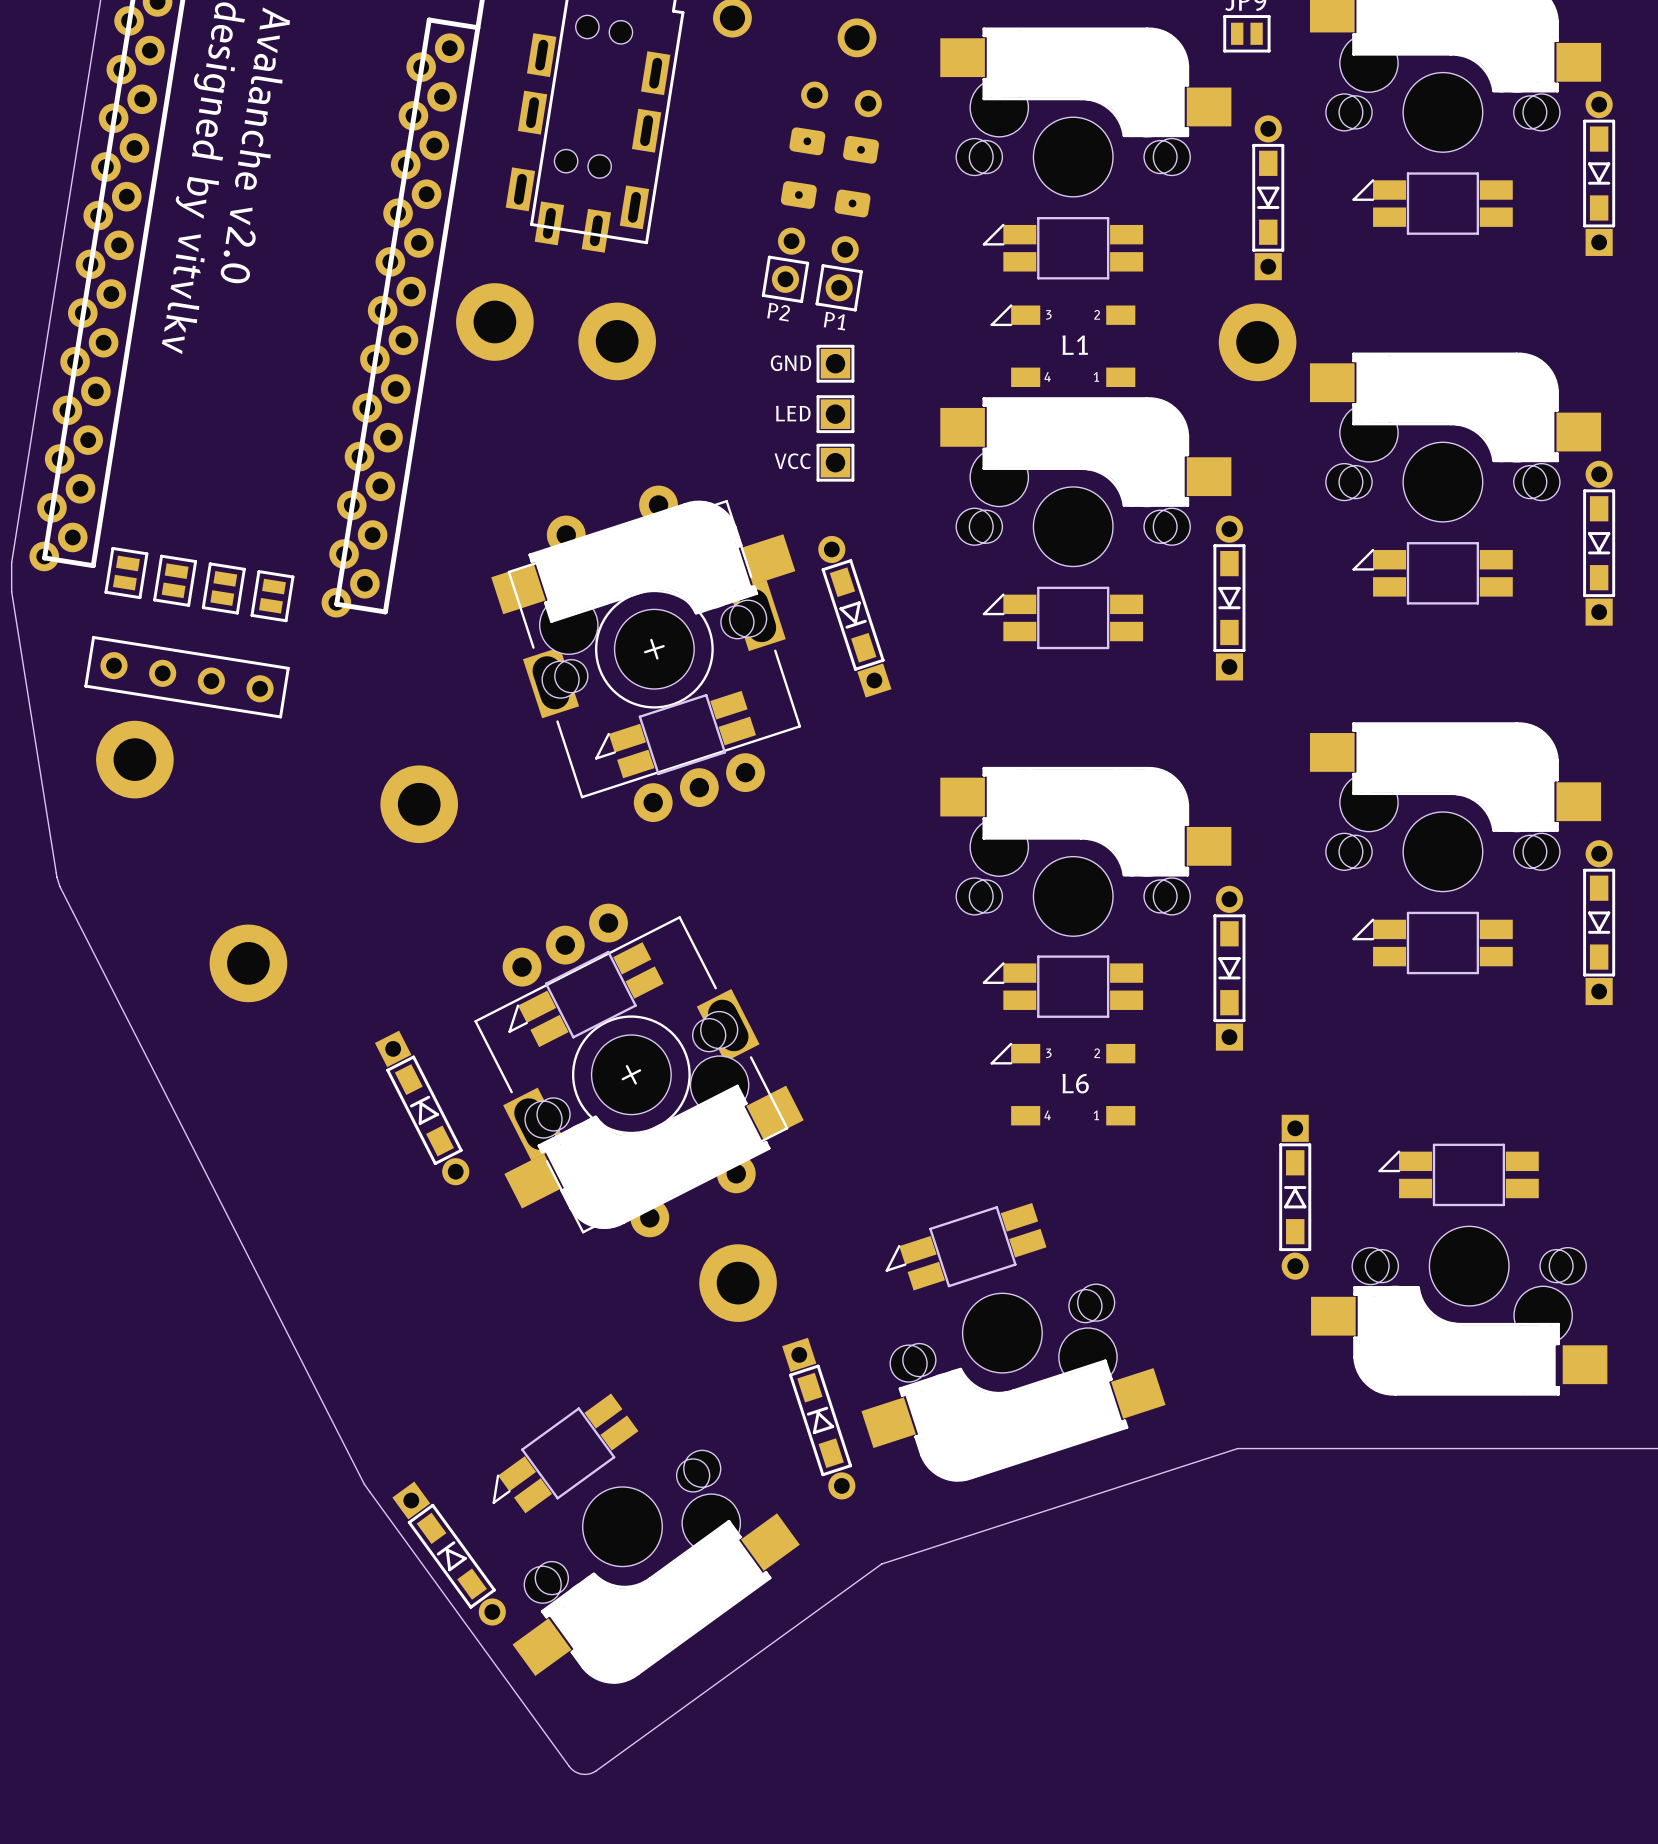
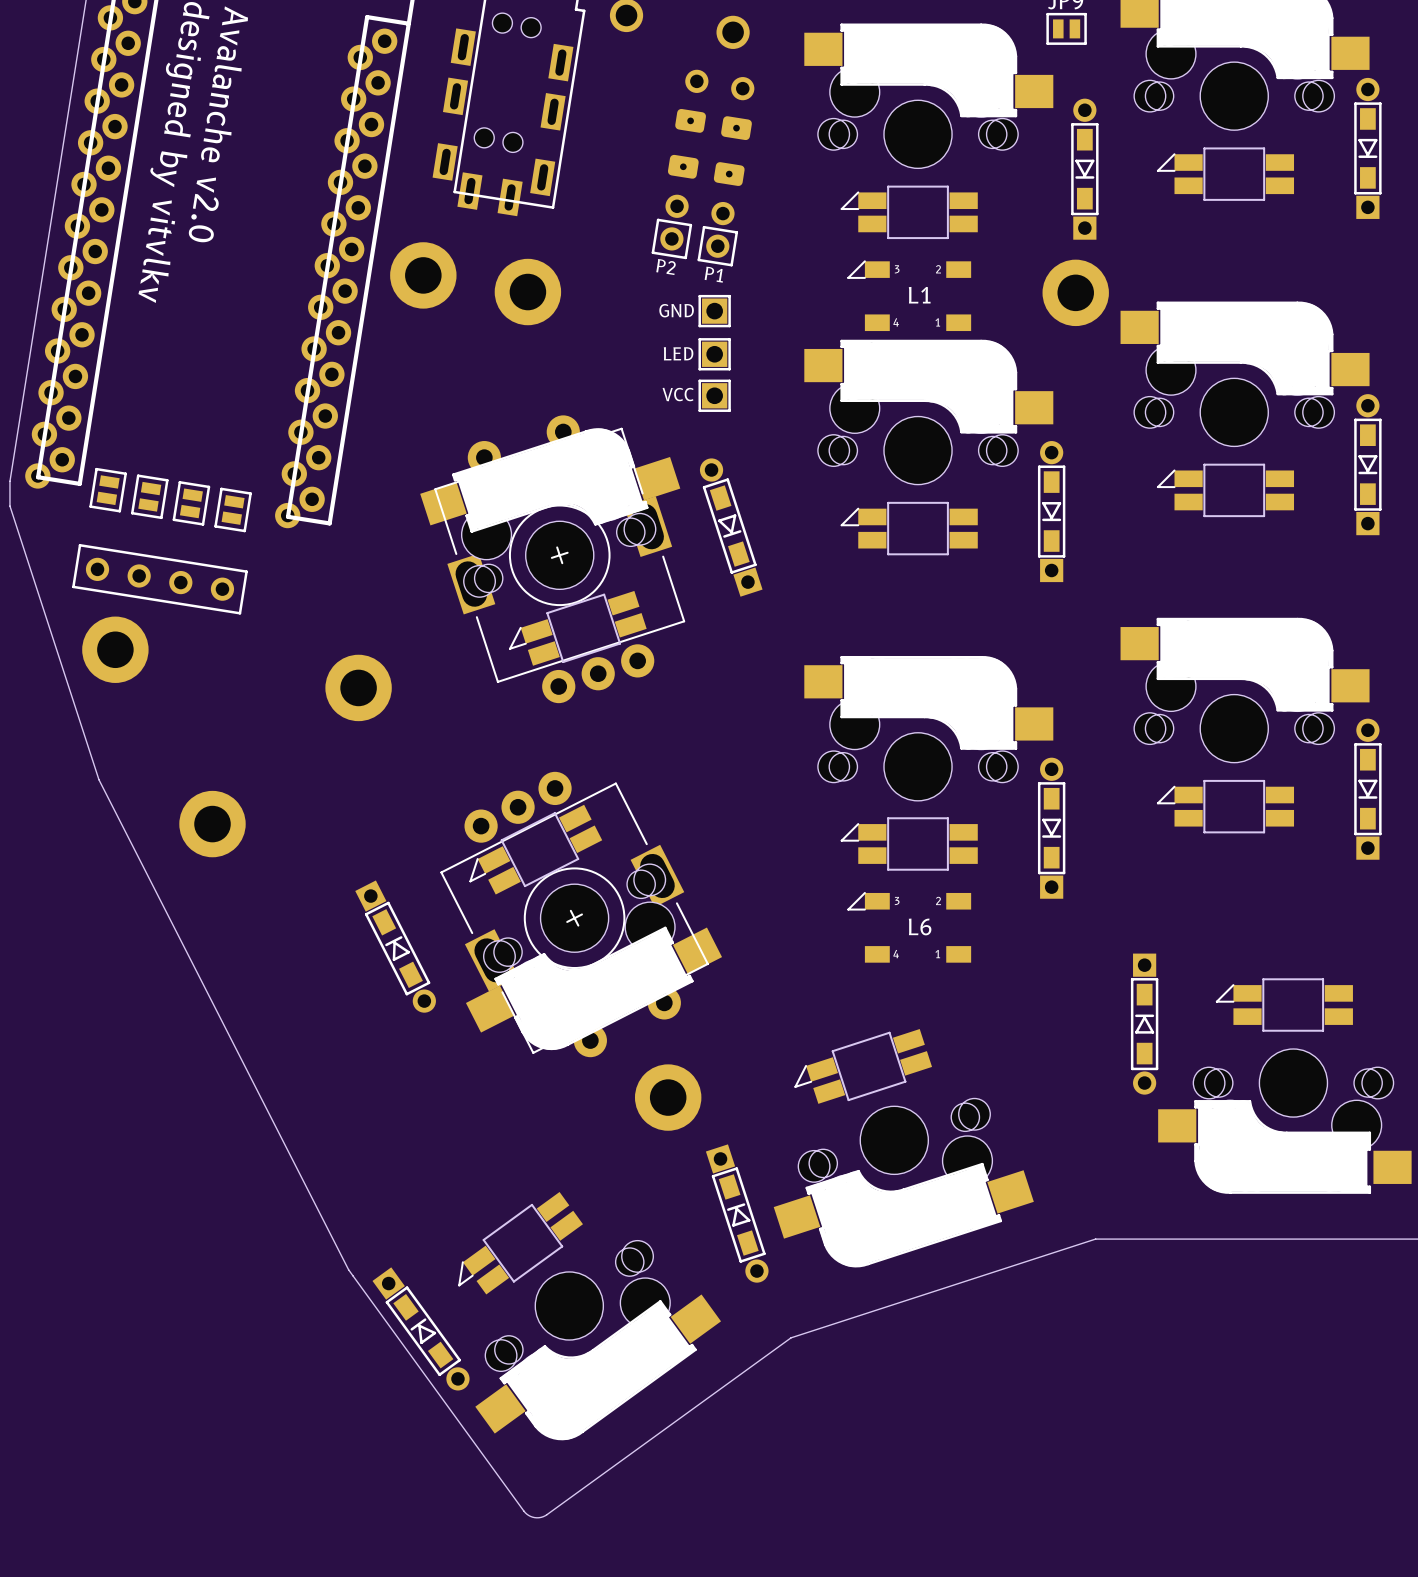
board edge: (11, 591) (59, 886) (364, 1484) (574, 1771) (587, 1774) (596, 1770) (881, 1564) (1237, 1448) (1280, 1448) -> (9, 506) (98, 779) (348, 1269) (528, 1515) (538, 1517) (547, 1514) (791, 1337) (1095, 1239)
part position: (586, 994) -> (535, 849)
part position: (631, 1070) -> (574, 914)
part position: (422, 1107) -> (395, 946)
part position: (654, 1120) -> (593, 957)
part position: (1458, 1174) -> (1284, 1005)
part position: (1295, 1197) -> (1144, 1024)
part position: (966, 1246) -> (863, 1066)
part position: (738, 1283) -> (668, 1097)
part position: (1459, 1311) -> (1284, 1121)
part position: (1013, 1382) -> (903, 1182)
part position: (818, 1418) -> (737, 1213)
part position: (565, 1453) -> (520, 1243)
part position: (449, 1553) -> (421, 1328)
part position: (656, 1567) -> (598, 1340)

